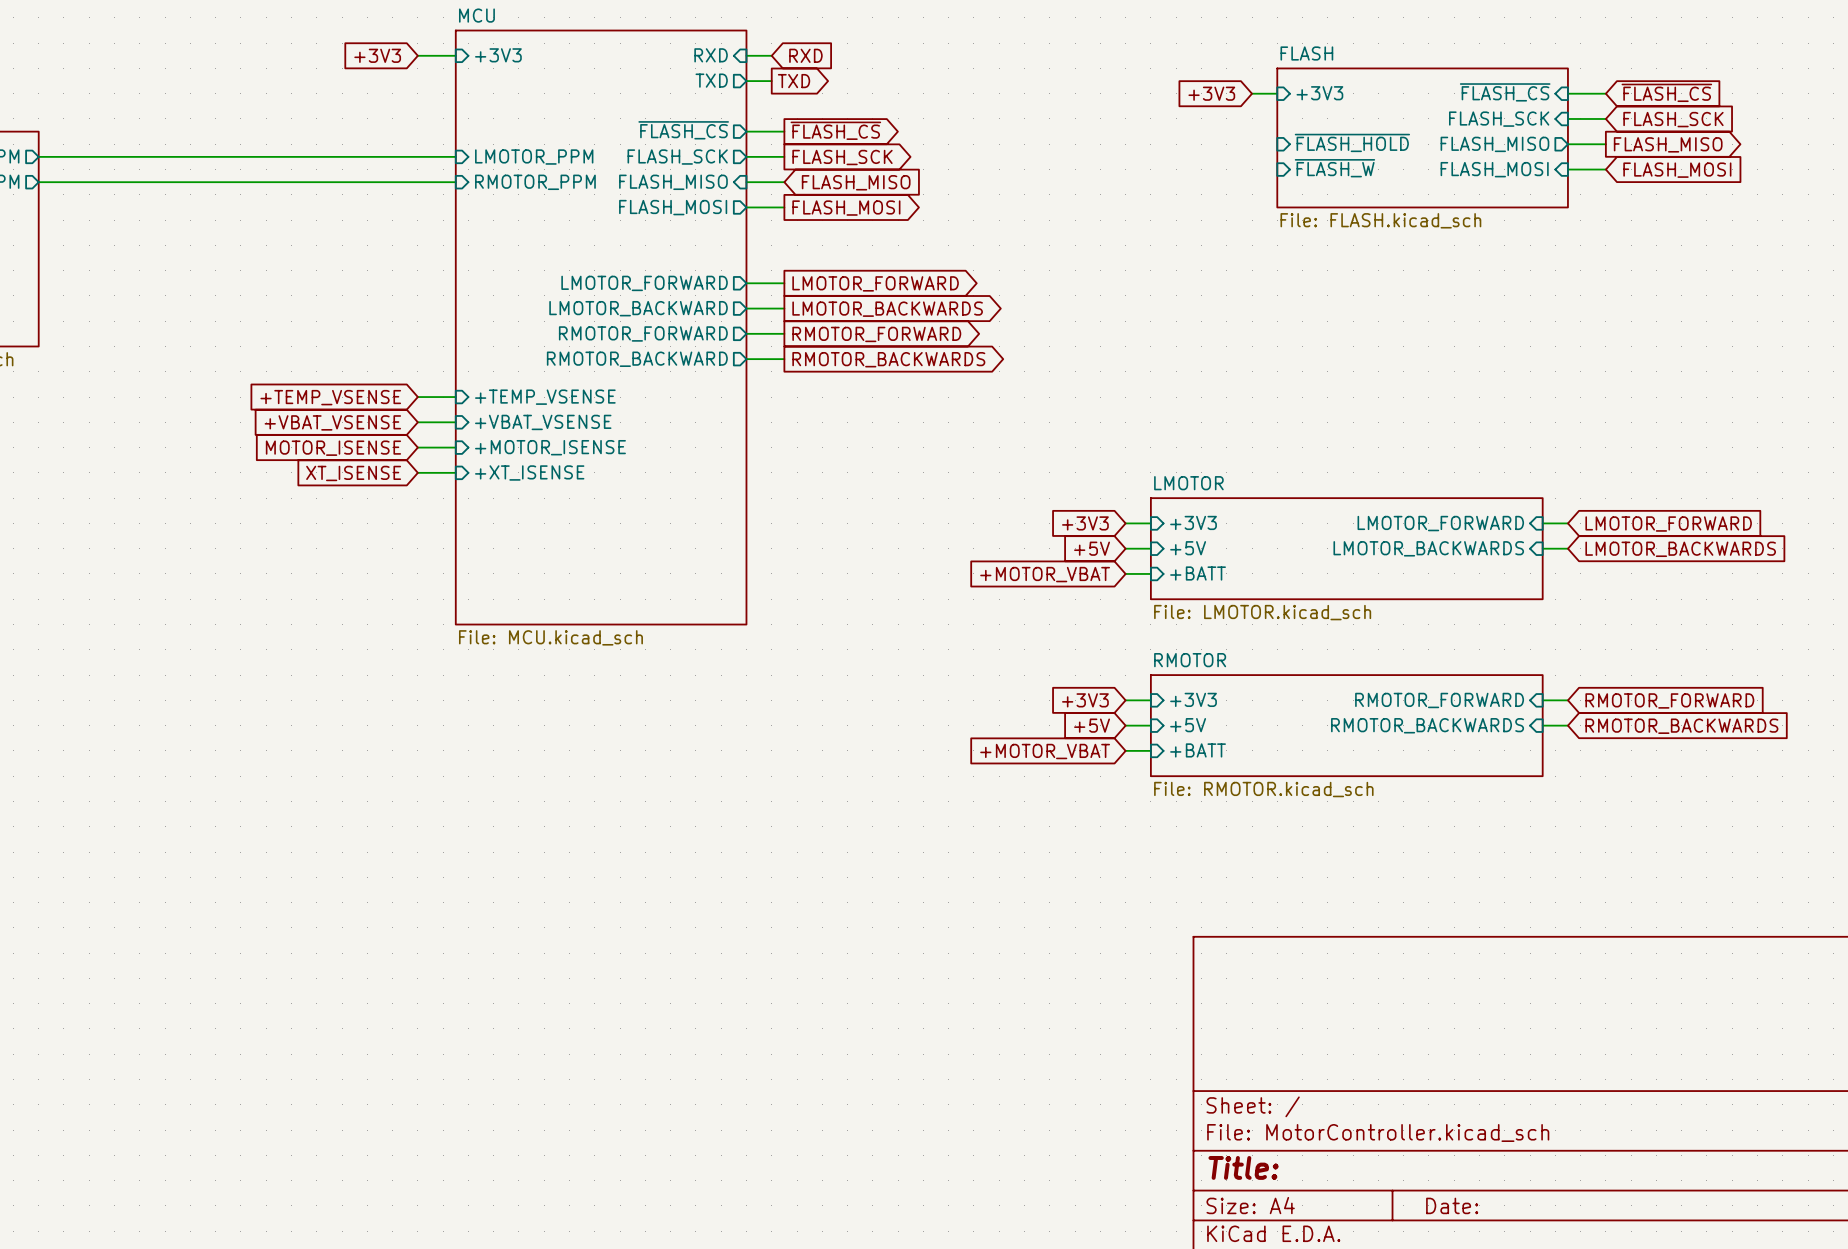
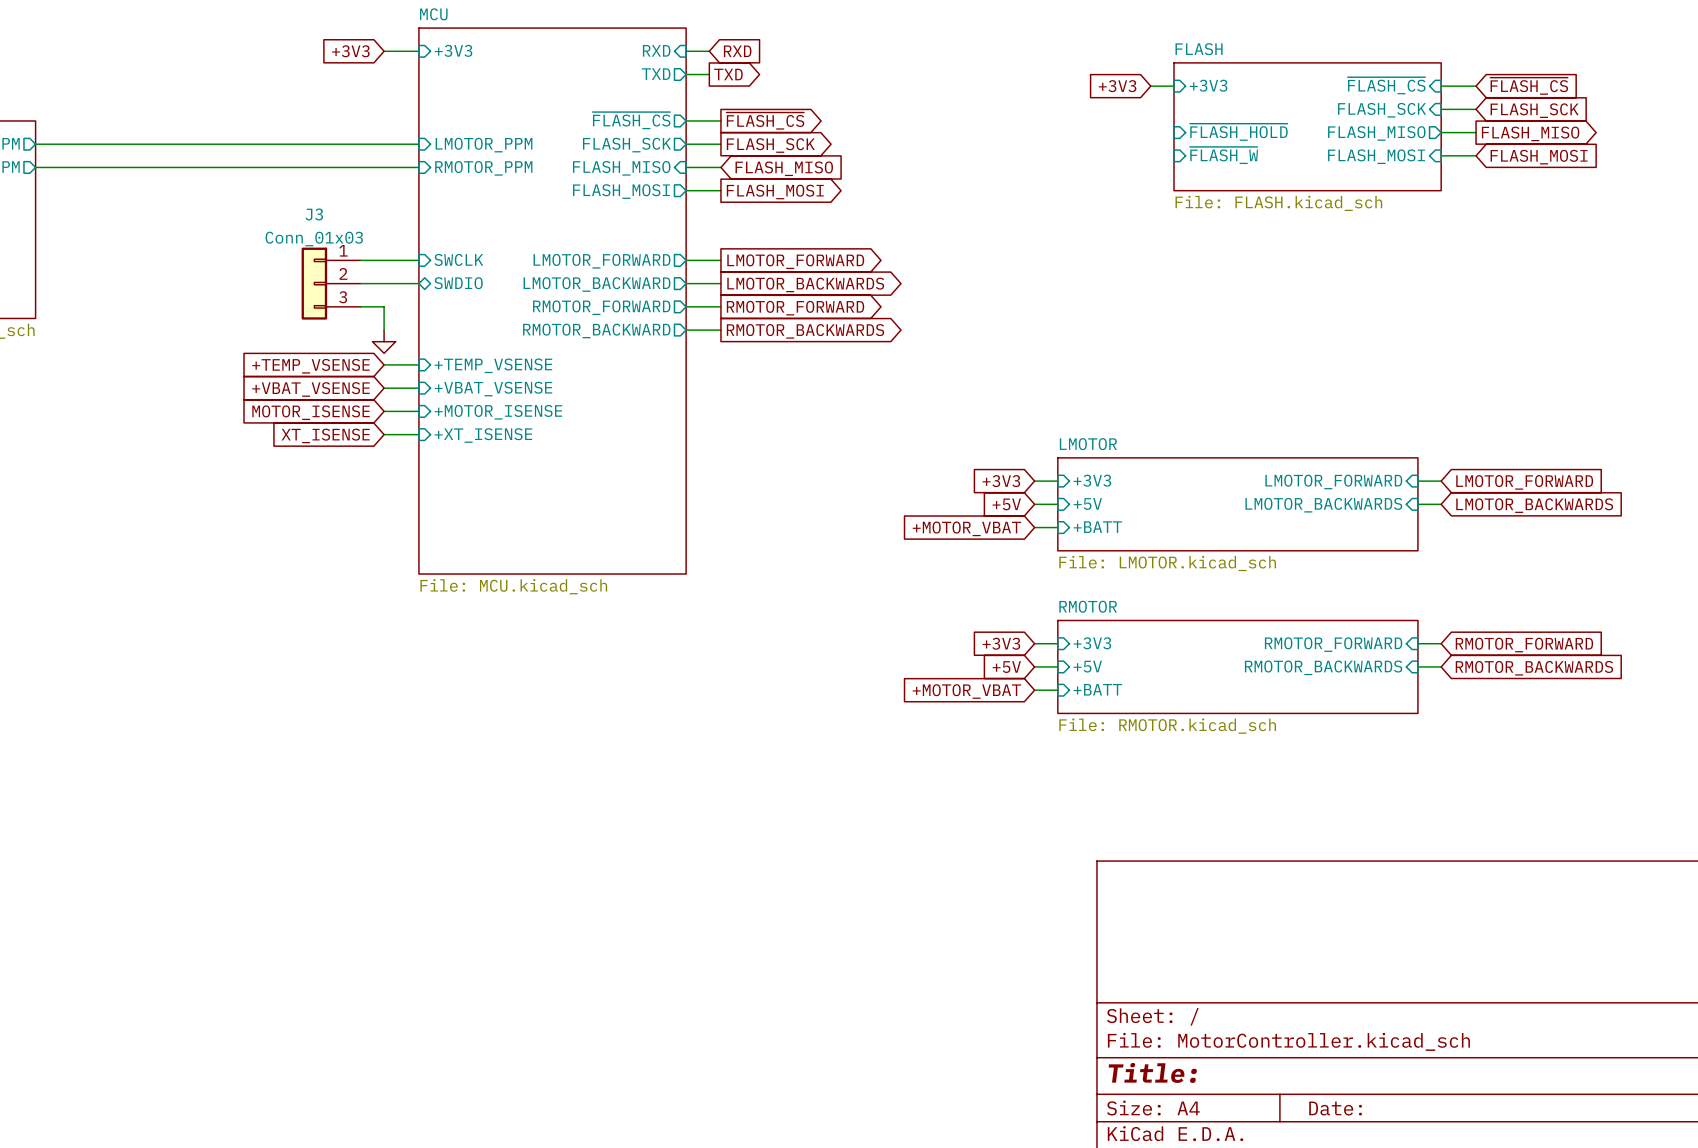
sheet pin: none -> SWCLK (458, 259)
wire: none -> (360, 260) (418, 260)
J3: none -> Conn_01x03 (331, 283)
wire: none -> (360, 283) (418, 283)
sheet pin: none -> SWDIO (458, 283)
wire: none -> (360, 306) (384, 306) (384, 330)
power symbol: none -> (384, 341)

